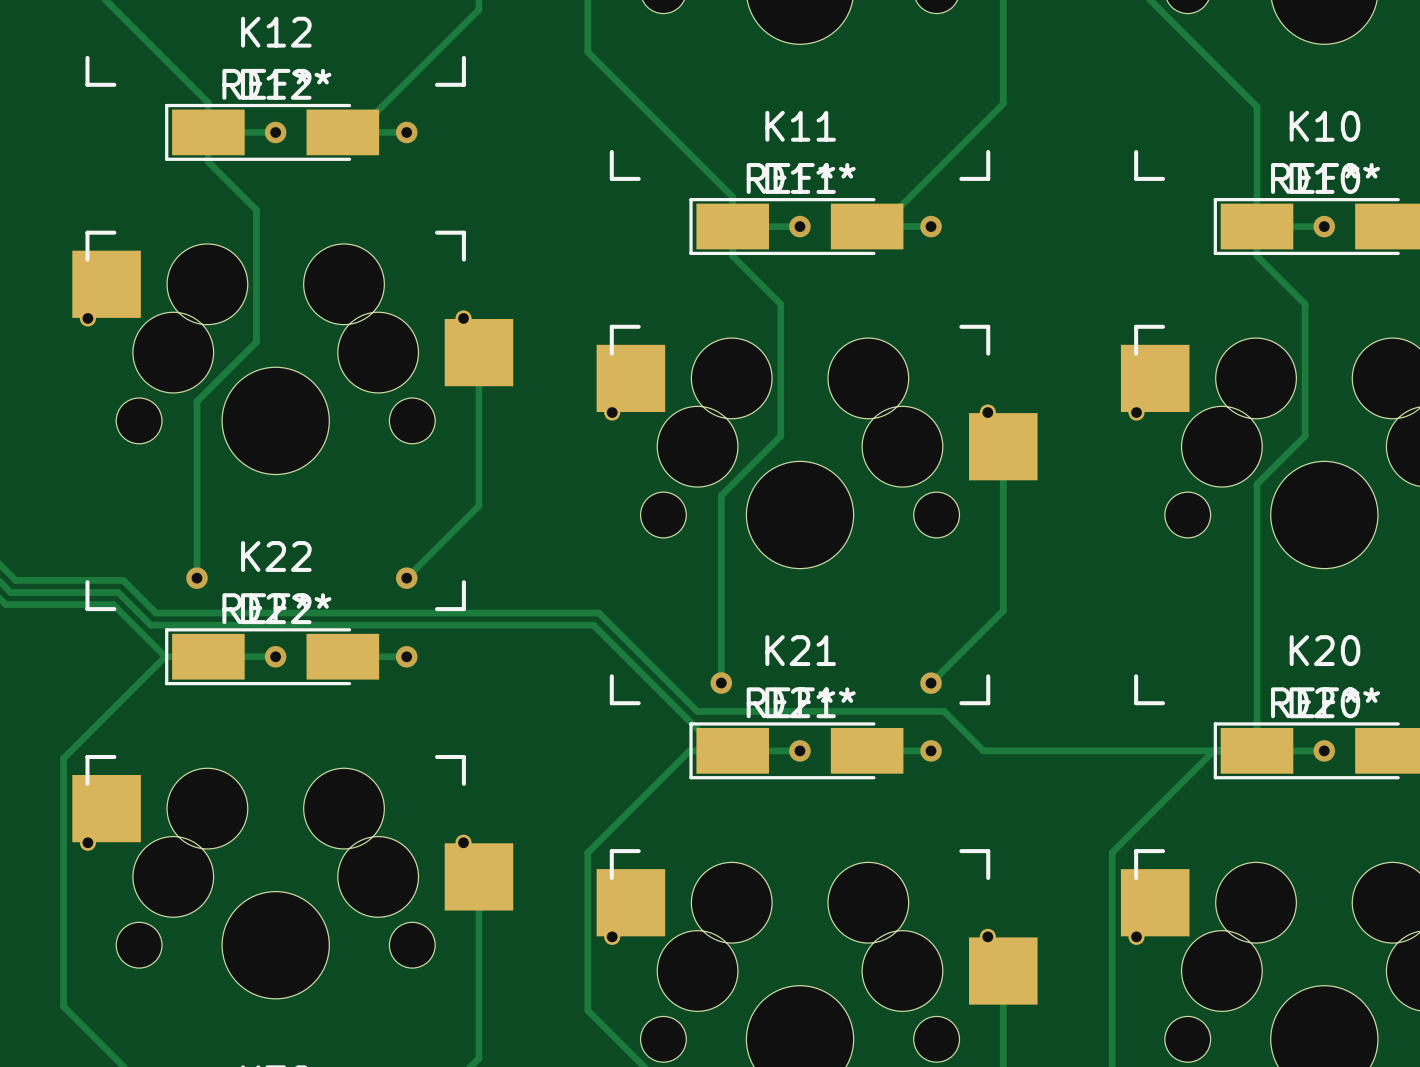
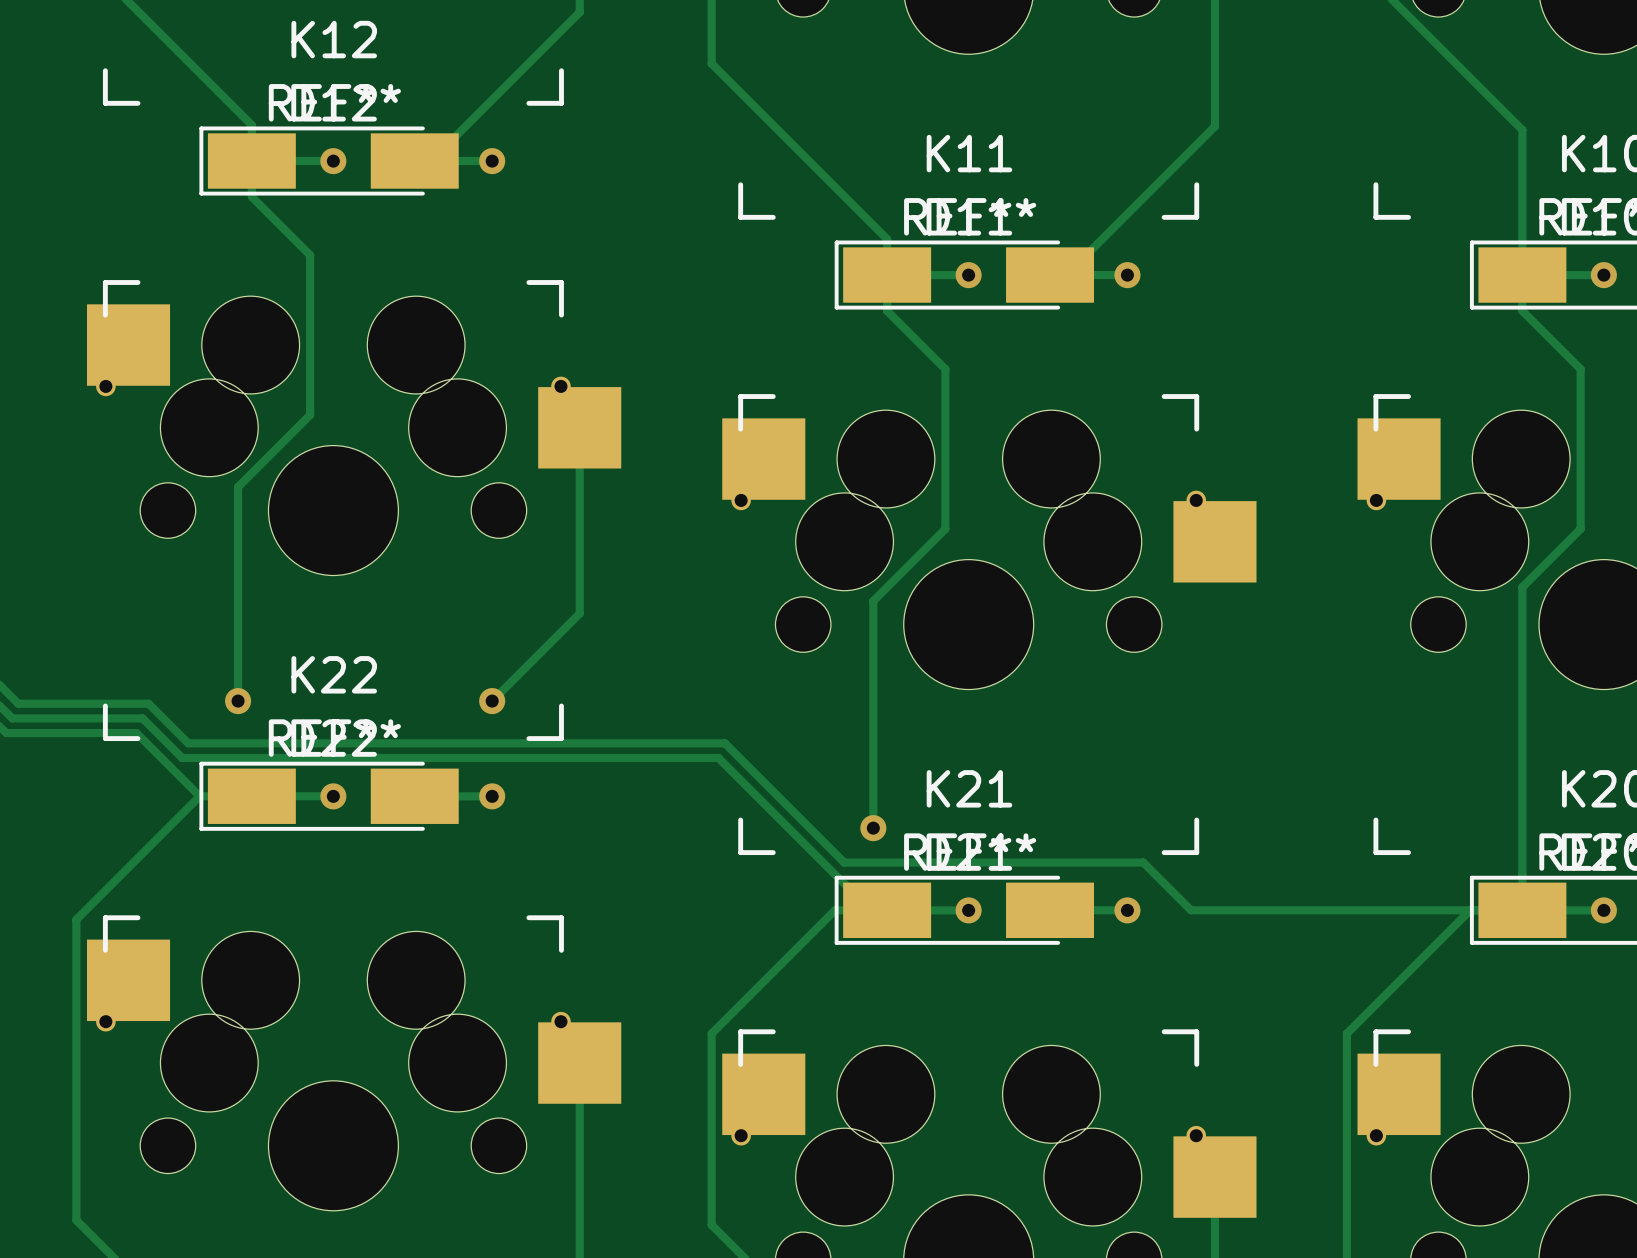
track: (987, 412) (987, 431) (1003, 446) (1003, 610) (931, 683) -> none
via: (931, 683) -> none

